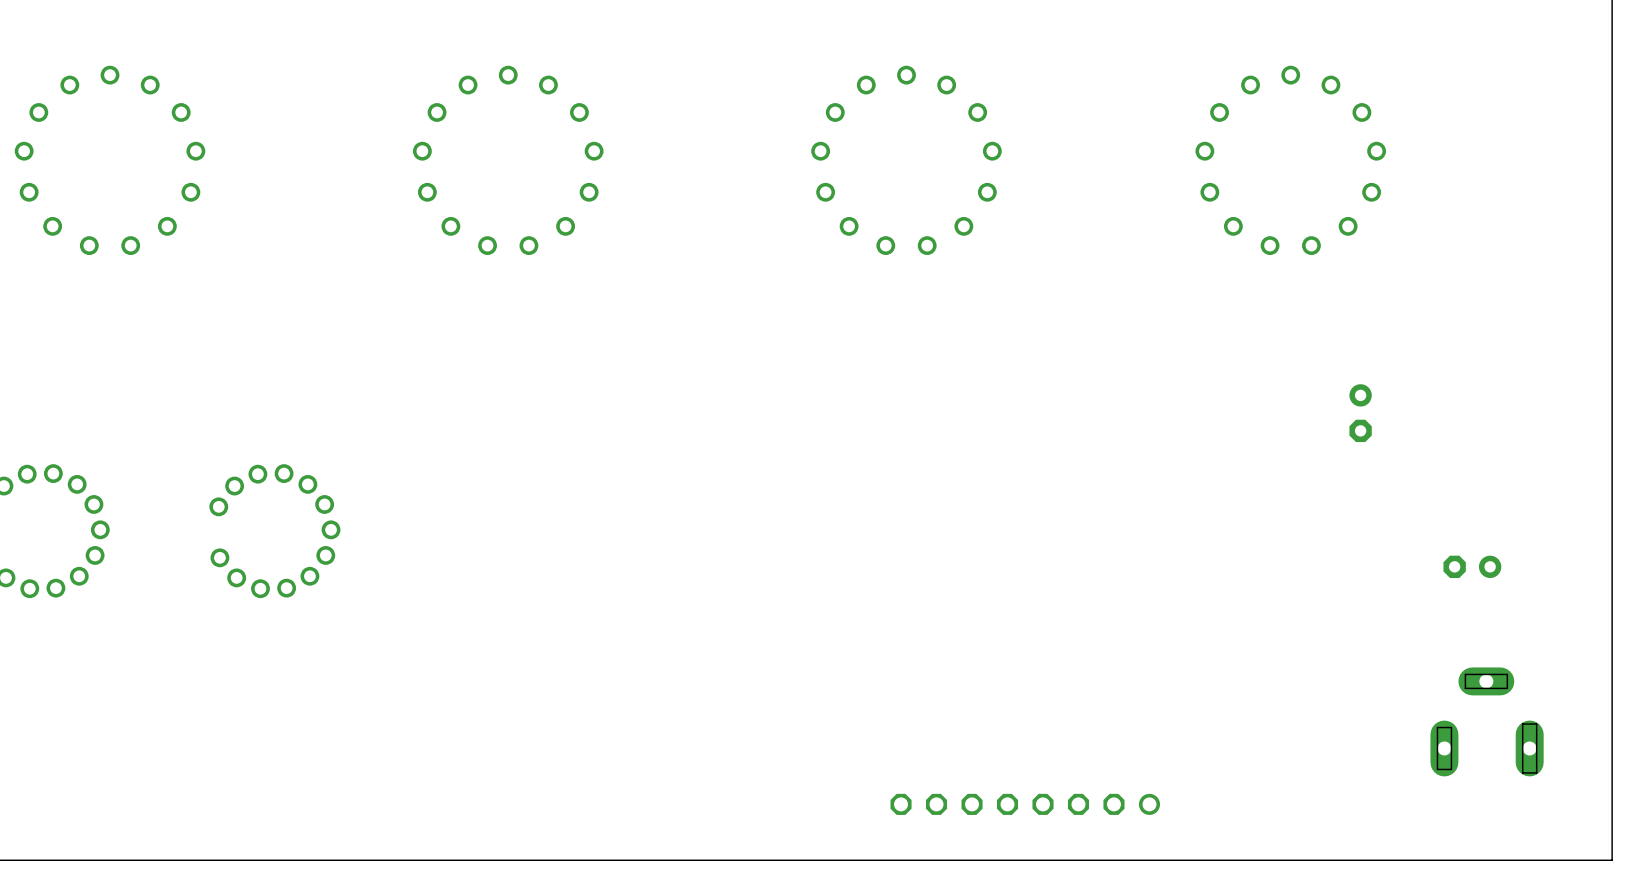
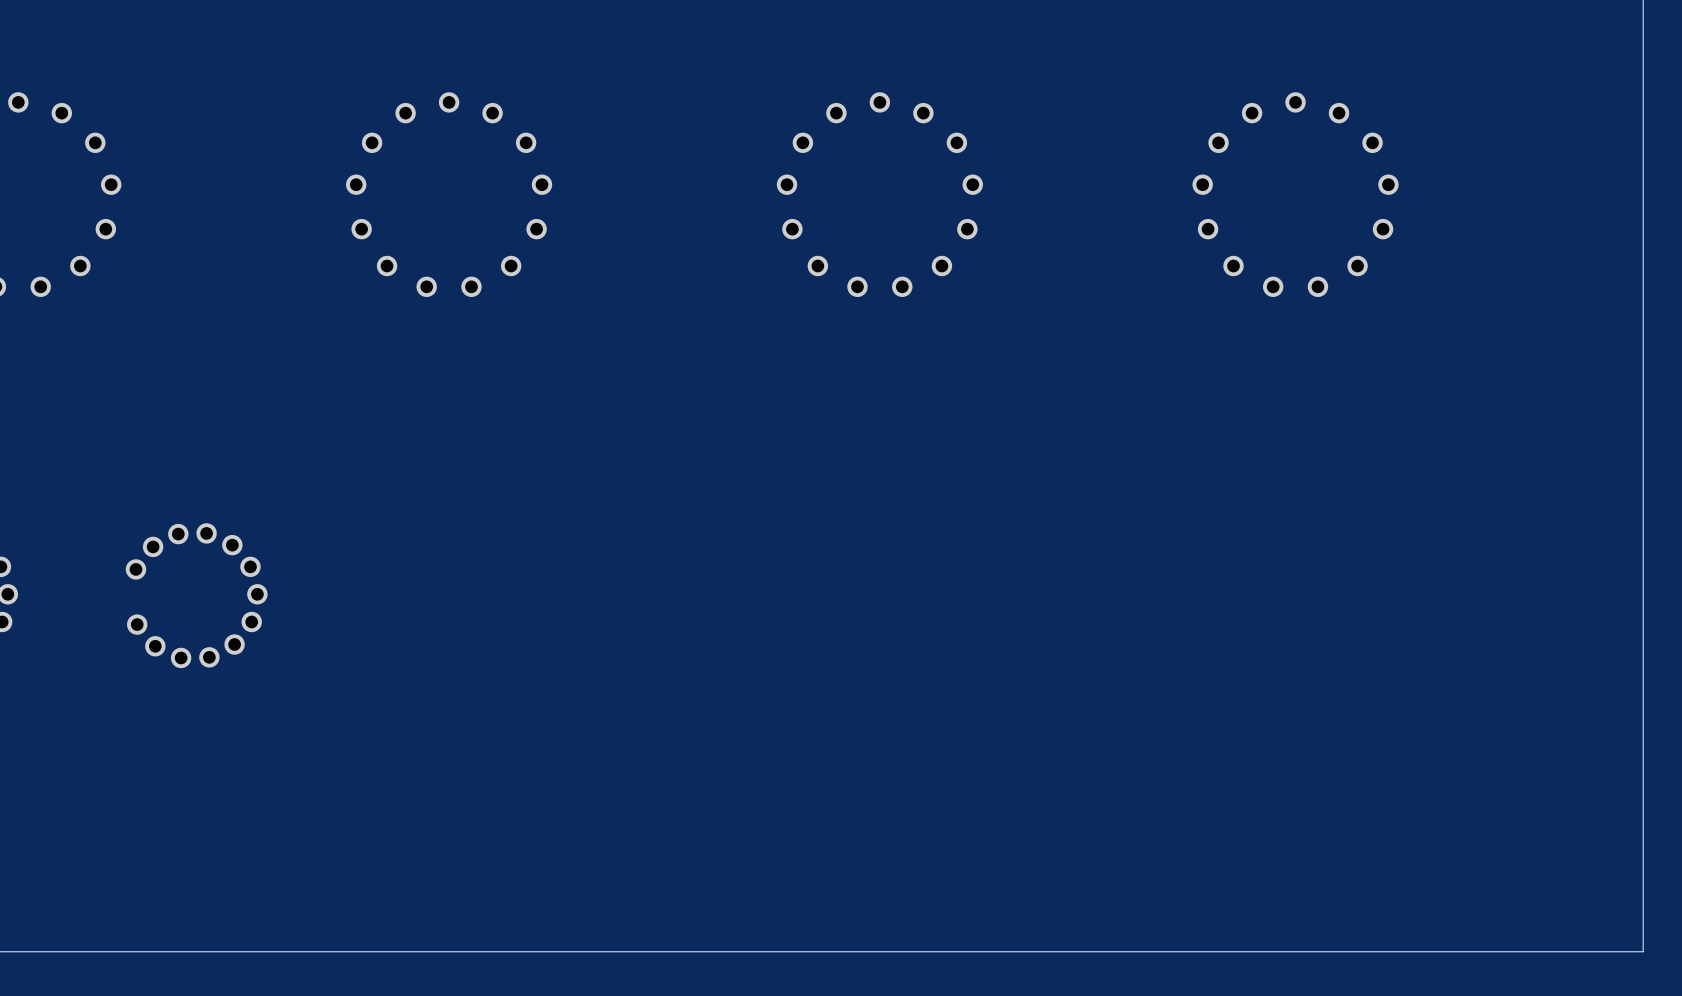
part: (1360, 413) -> none
part: (1472, 566) -> none
part: (1487, 721) -> none
part: (1025, 804) -> none

